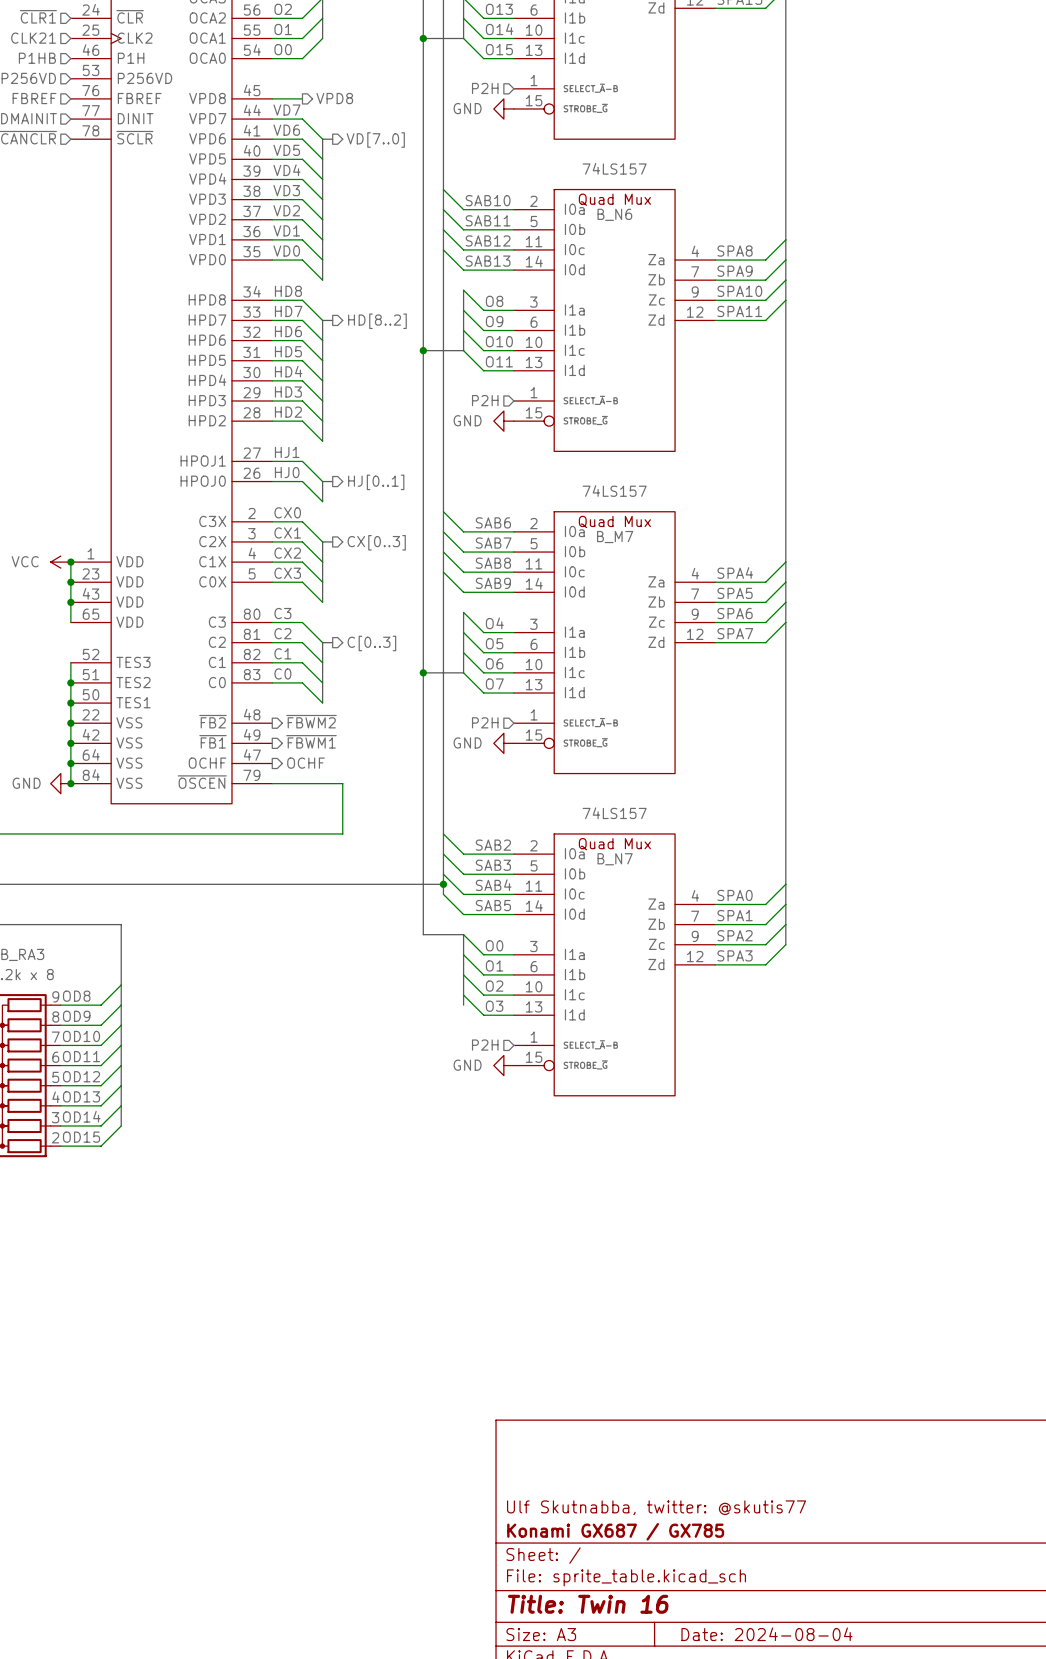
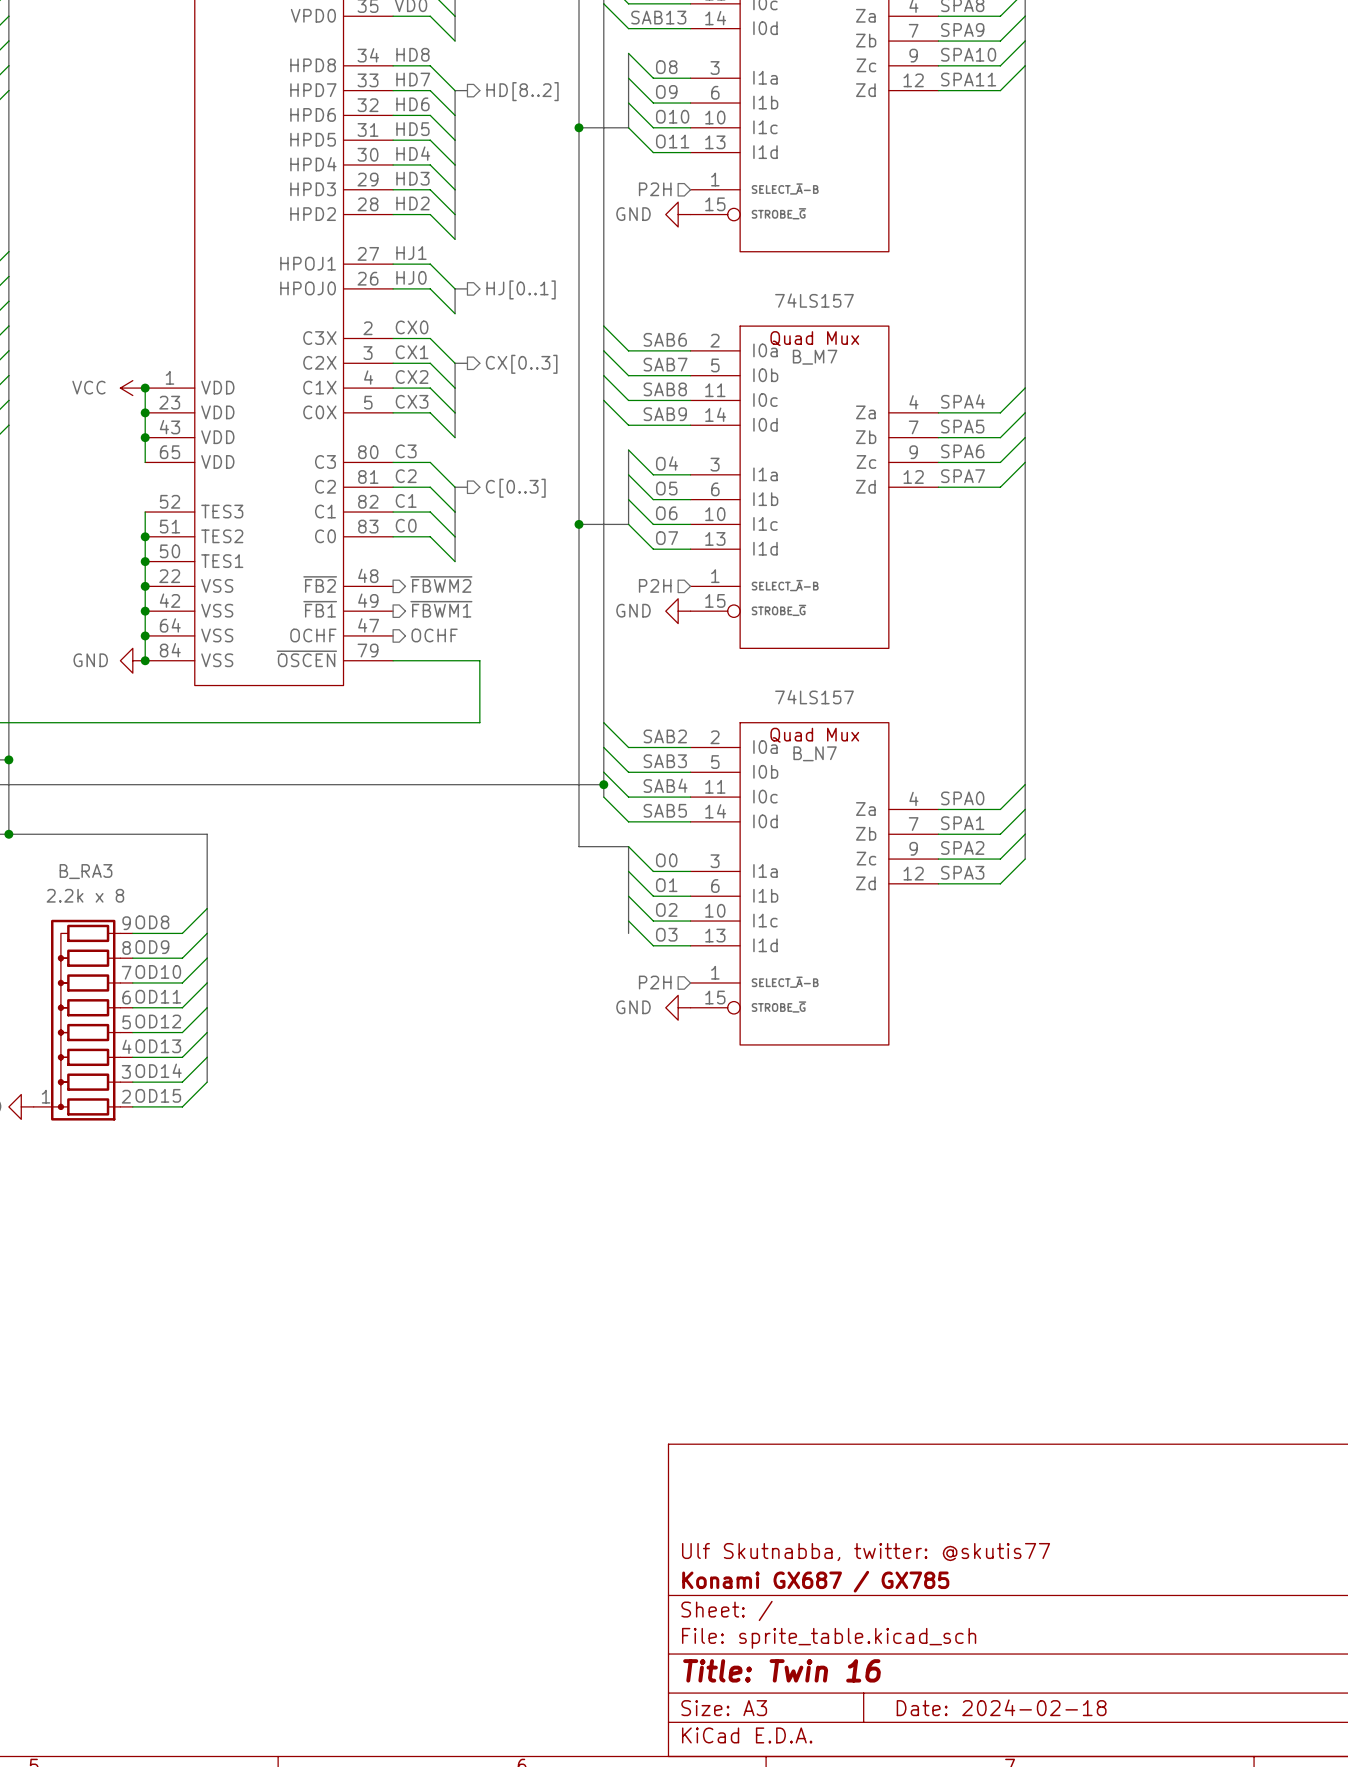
title block: Date: 2024-08-04 (766, 1634) -> Date: 2024-02-18 (1001, 1707)

